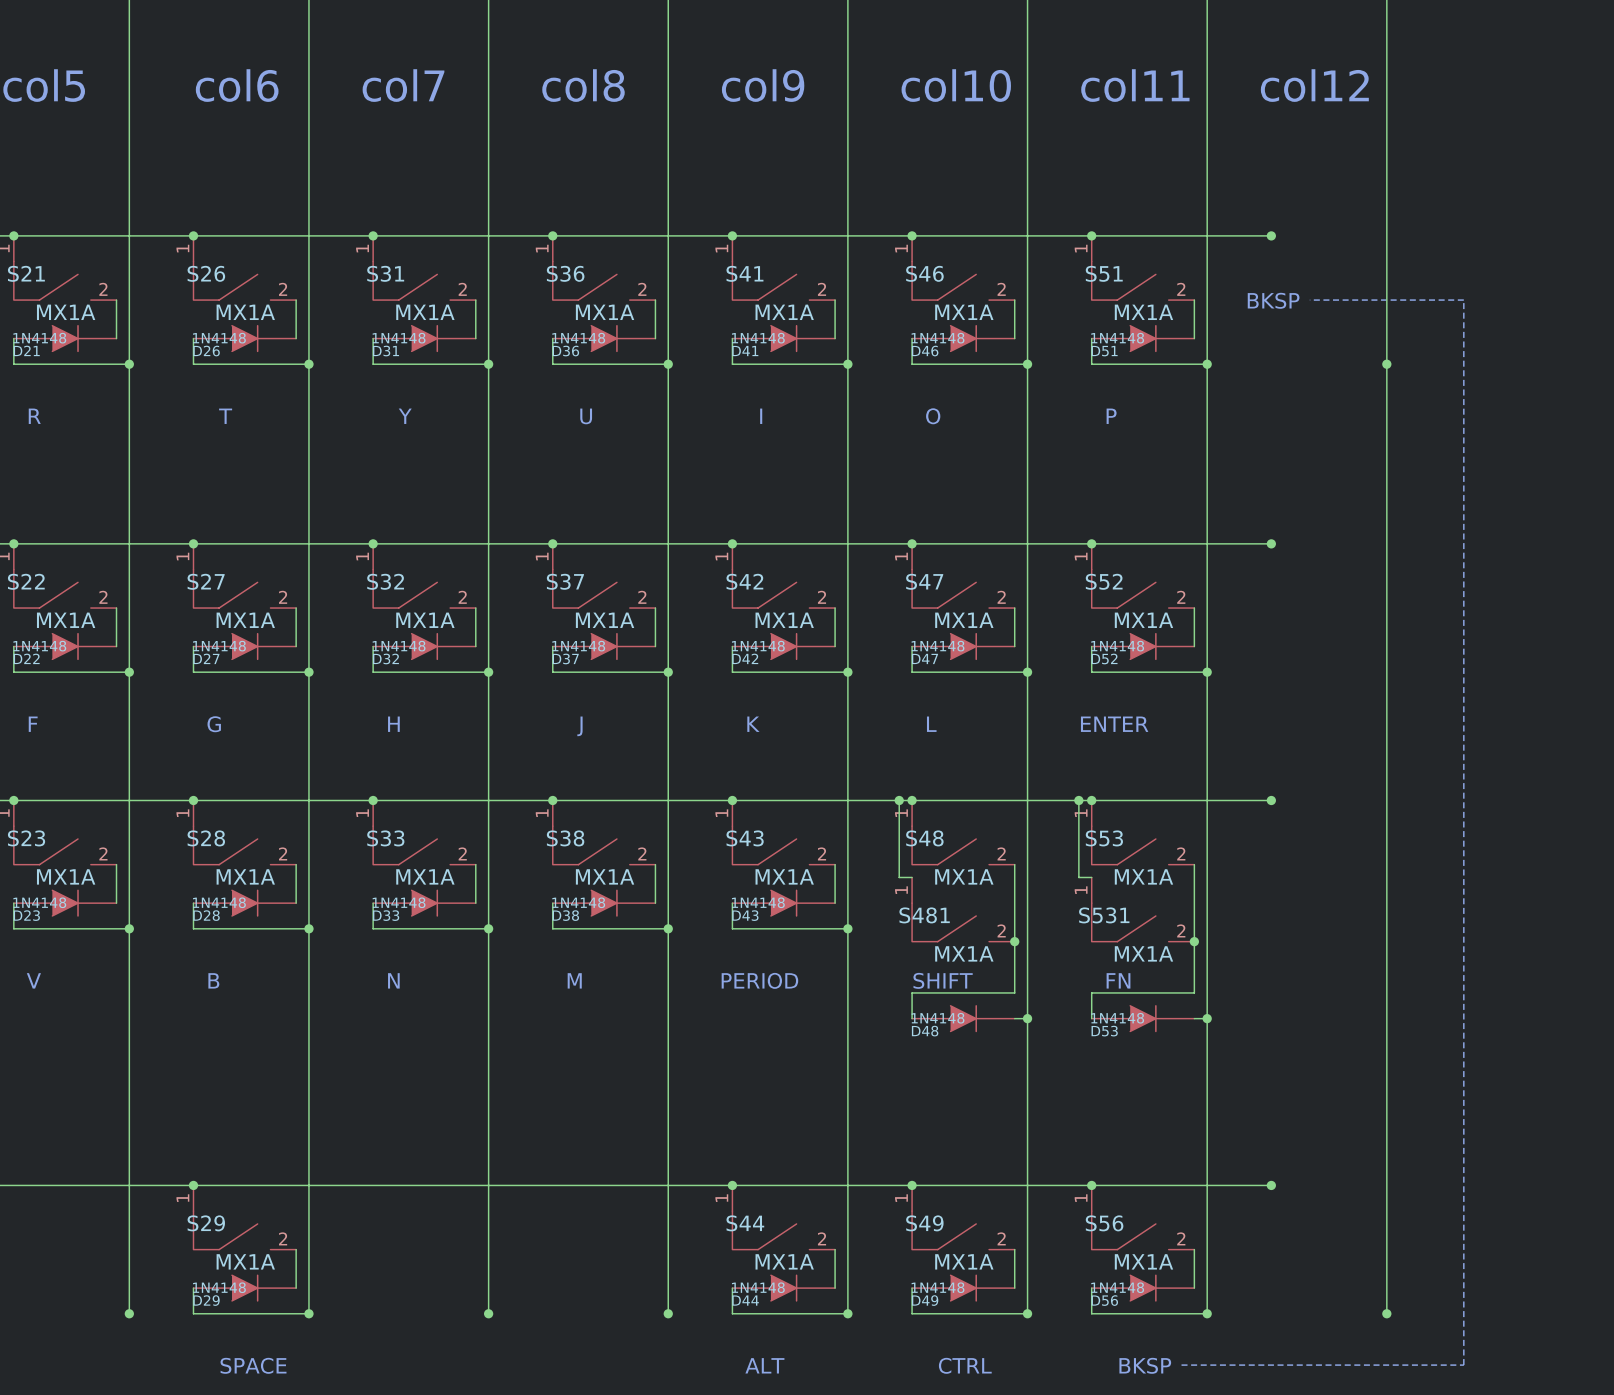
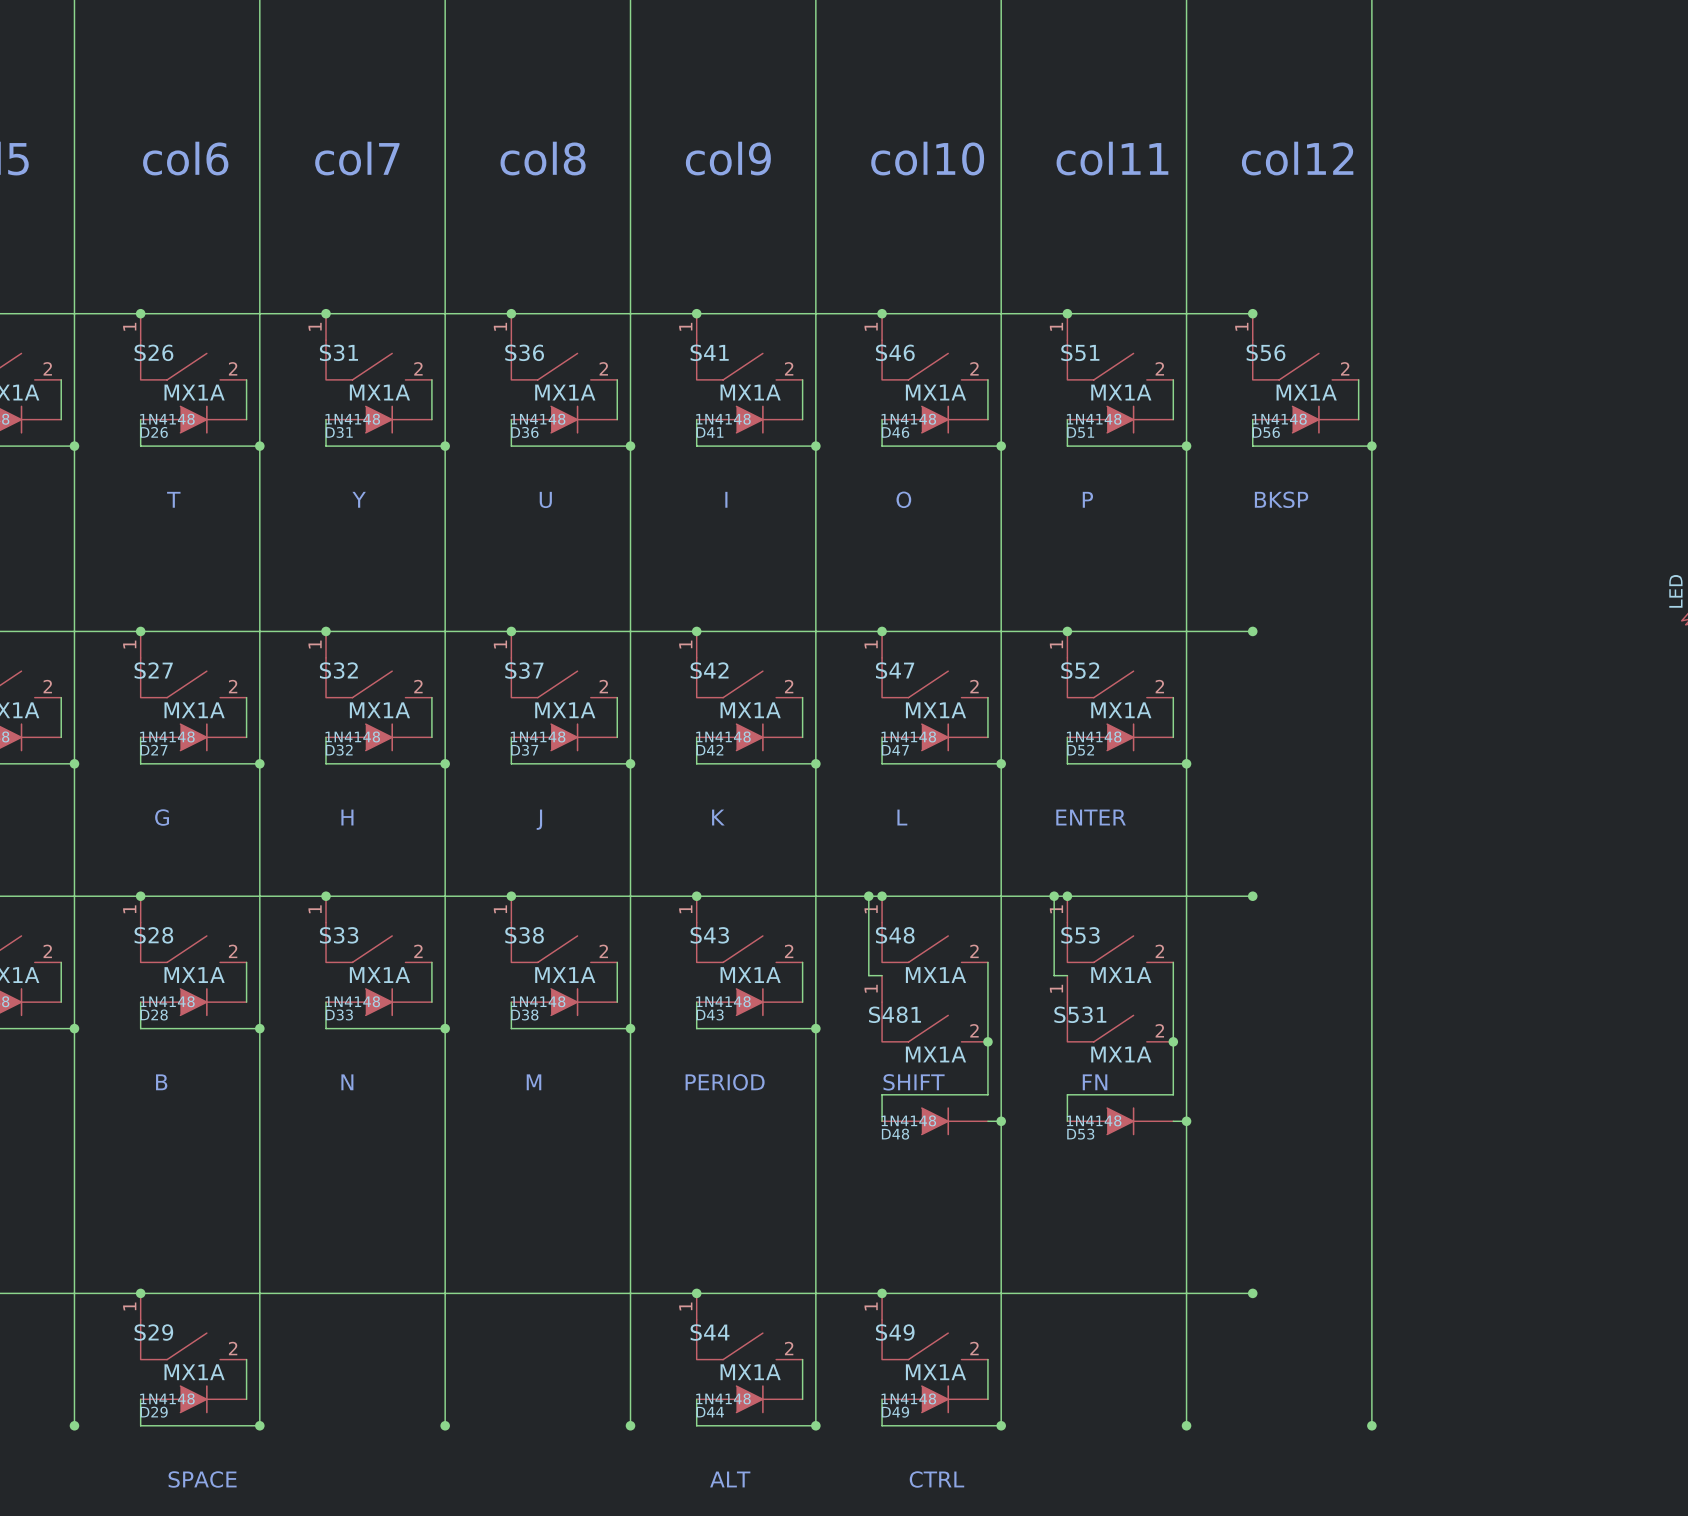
text position: BKSP (1273, 300) -> BKSP (1281, 499)
line: (1309, 300) (1463, 300) (1463, 1365) (1181, 1365) -> none
wire: none -> (1358, 379) (1358, 419)
wire: none -> (1252, 419) (1252, 446) (1371, 446)
junction: (1091, 1185) -> none
S56 position: (1143, 1217) -> (1305, 346)
wire: (1194, 1249) (1194, 1288) -> none
wire: (1091, 1288) (1091, 1313) (1207, 1313) -> none
D56 position: (1143, 1288) -> (1305, 419)
text: BKSP (1145, 1365) -> none

